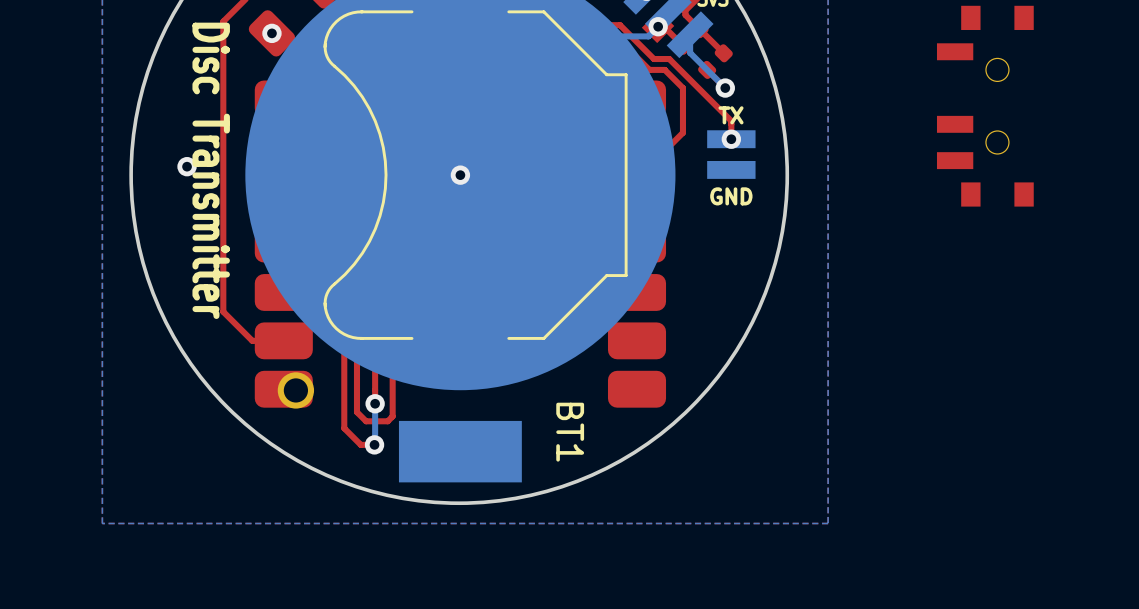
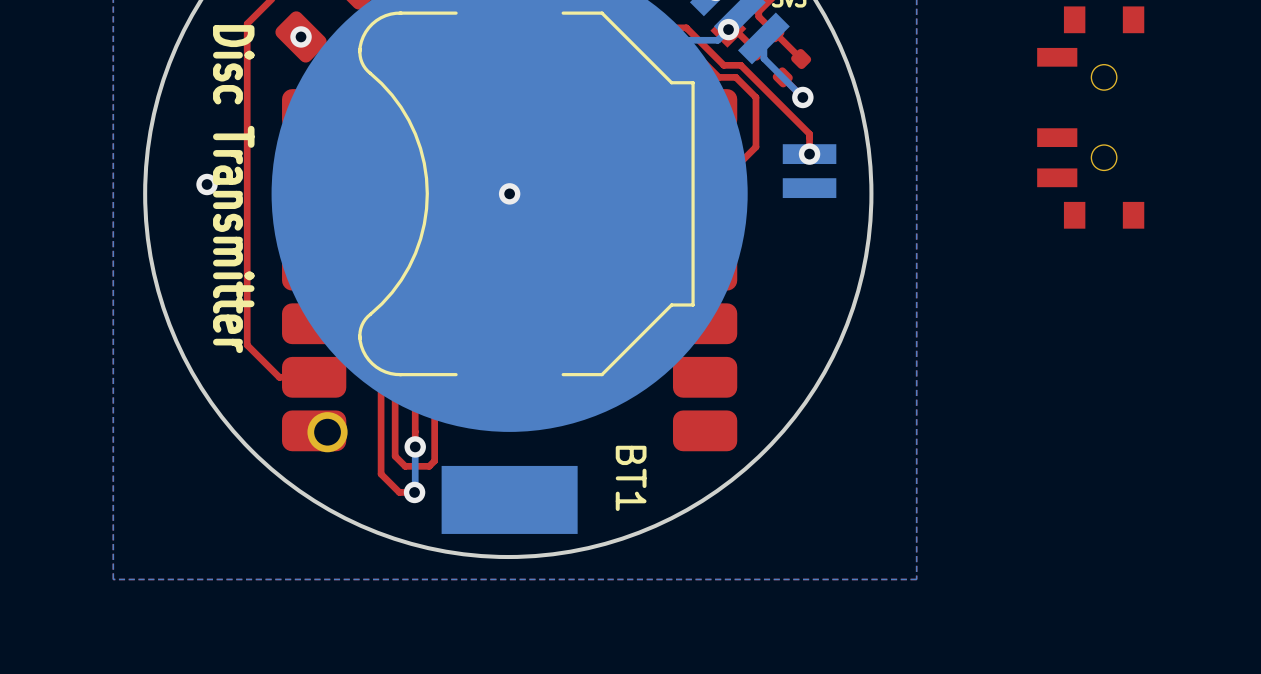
text: TX (731, 115) -> none
text: GND (731, 196) -> none

